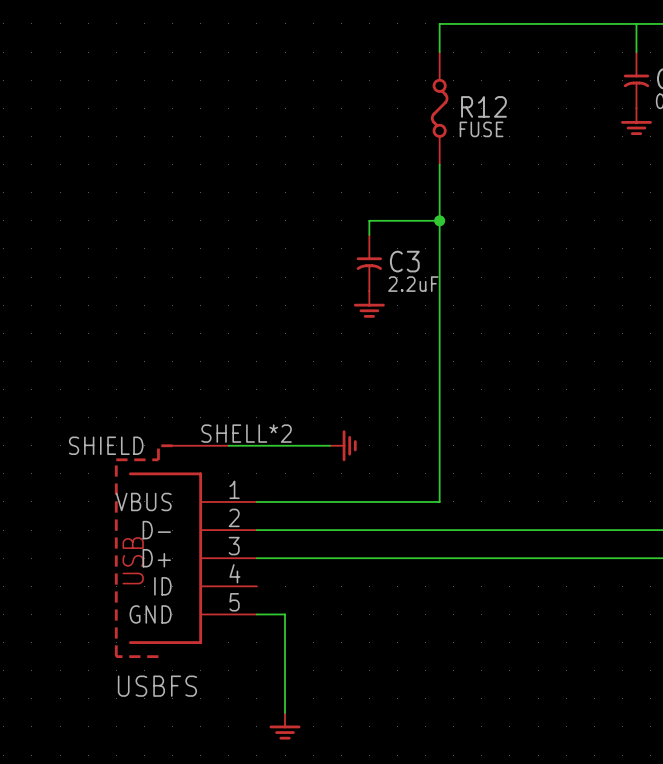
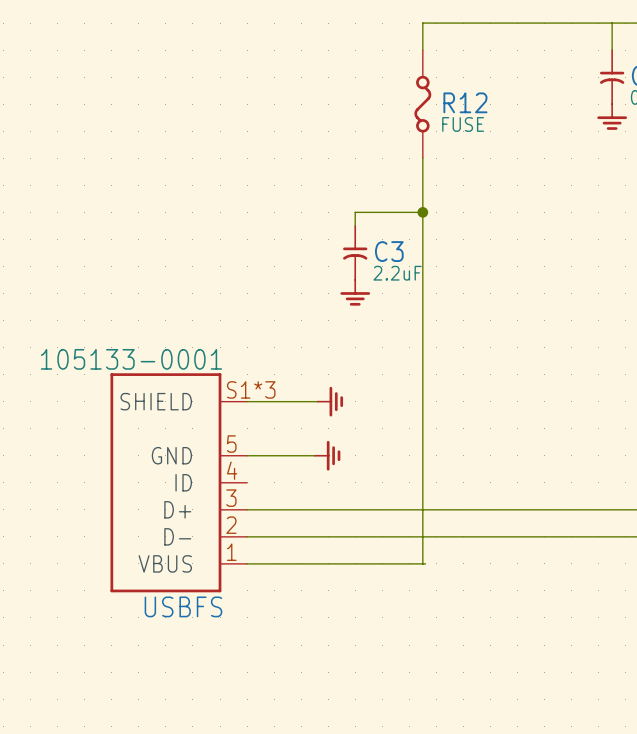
wire: none -> (247, 401) (317, 401)
power symbol: none -> (329, 401)
wire: (228, 445) (329, 445) -> none
power symbol: (342, 445) -> none
wire: none -> (247, 455) (314, 455)
power symbol: none -> (327, 455)
USBFS: none -> 105133-0001 (178, 482)
wire: (256, 501) (439, 501) -> (422, 563) (422, 482)
USBFS: (185, 551) -> none
wire: none -> (247, 563) (425, 563)
wire: (256, 614) (285, 614) (285, 712) -> none
power symbol: (285, 725) -> none

